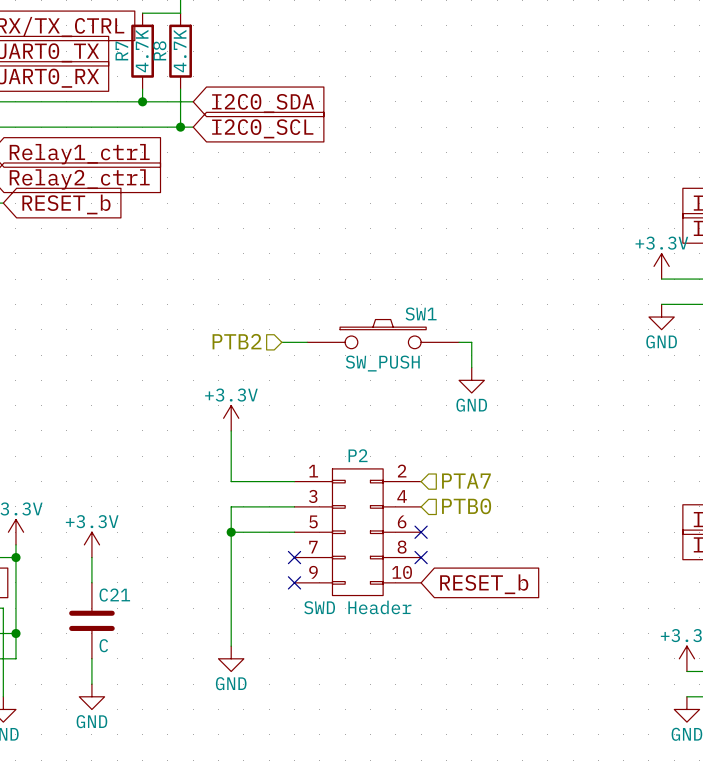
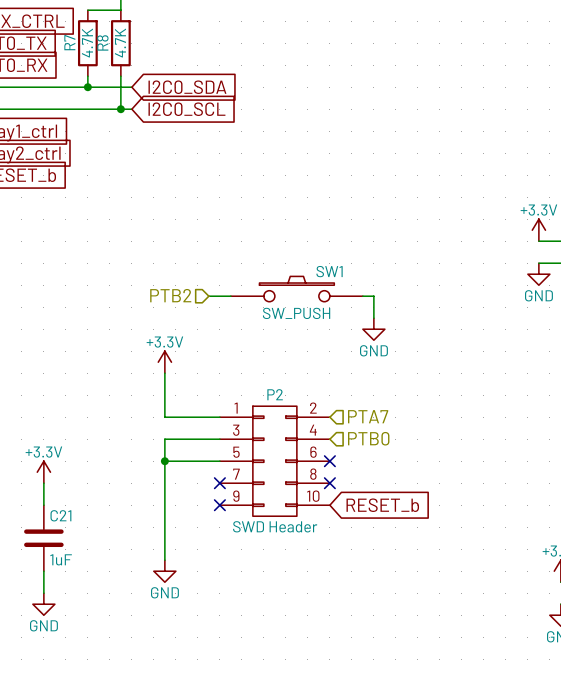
C21 value: C (103, 645) -> 1uF (61, 559)

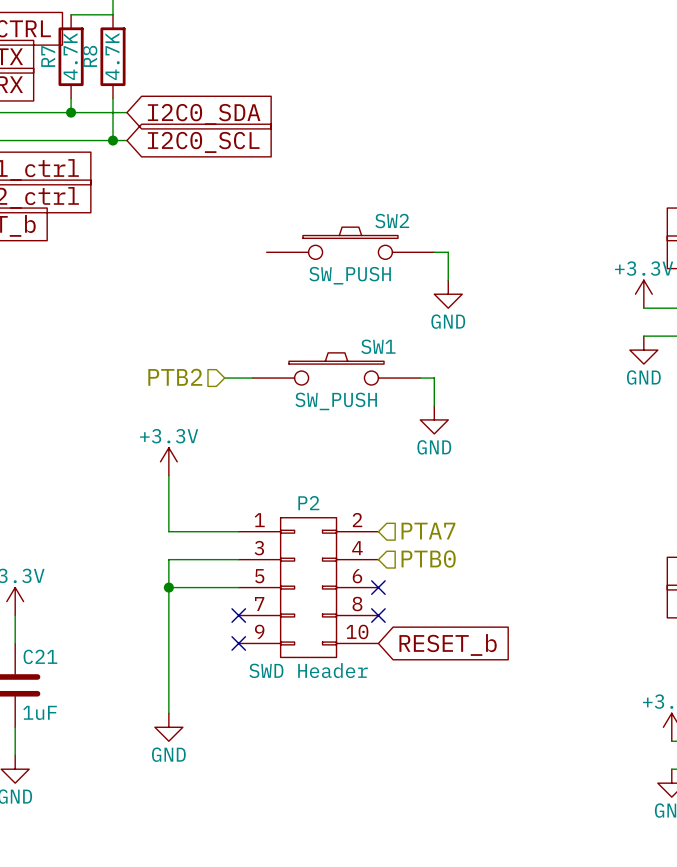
SW2: none -> SW_PUSH (350, 243)
wire: none -> (434, 252) (448, 252) (448, 280)
power symbol: none -> GND (448, 294)

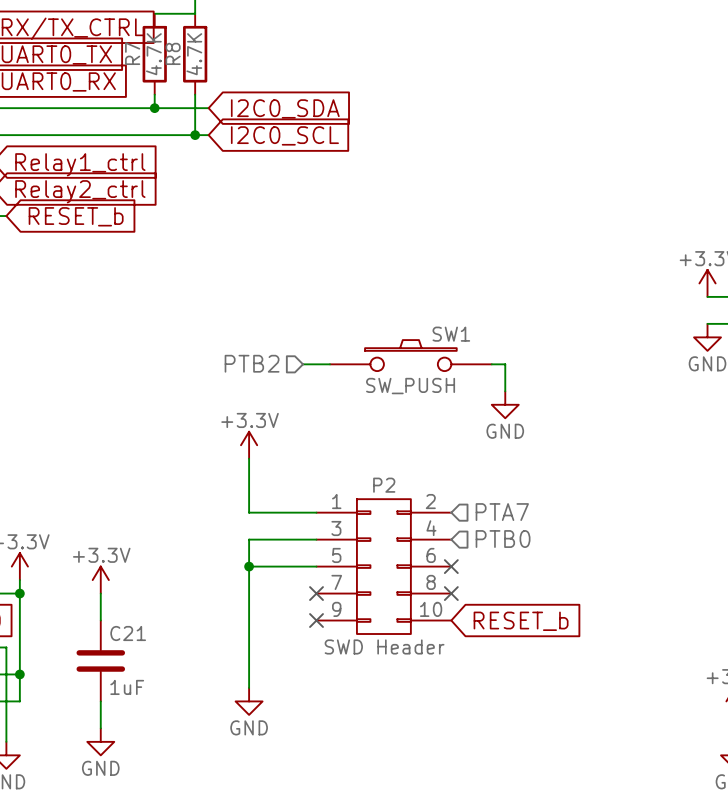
SW2: SW_PUSH (350, 243) -> none
wire: (434, 252) (448, 252) (448, 280) -> none
power symbol: GND (448, 294) -> none

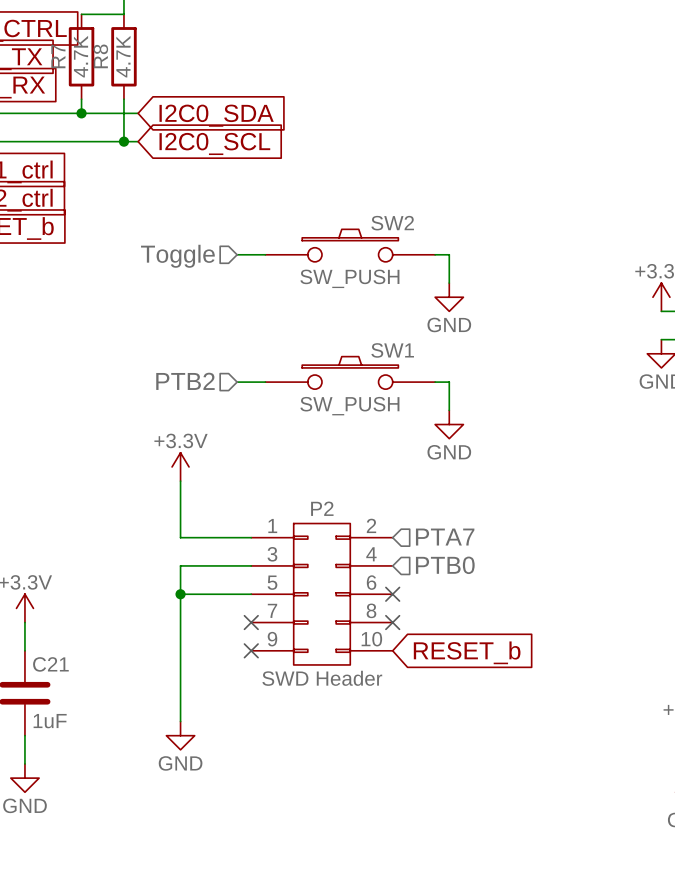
SW2: none -> SW_PUSH (350, 245)
wire: none -> (237, 254) (265, 254)
wire: none -> (435, 254) (449, 254) (449, 283)
hierarchical label: none -> Toggle (177, 256)
power symbol: none -> GND (449, 297)

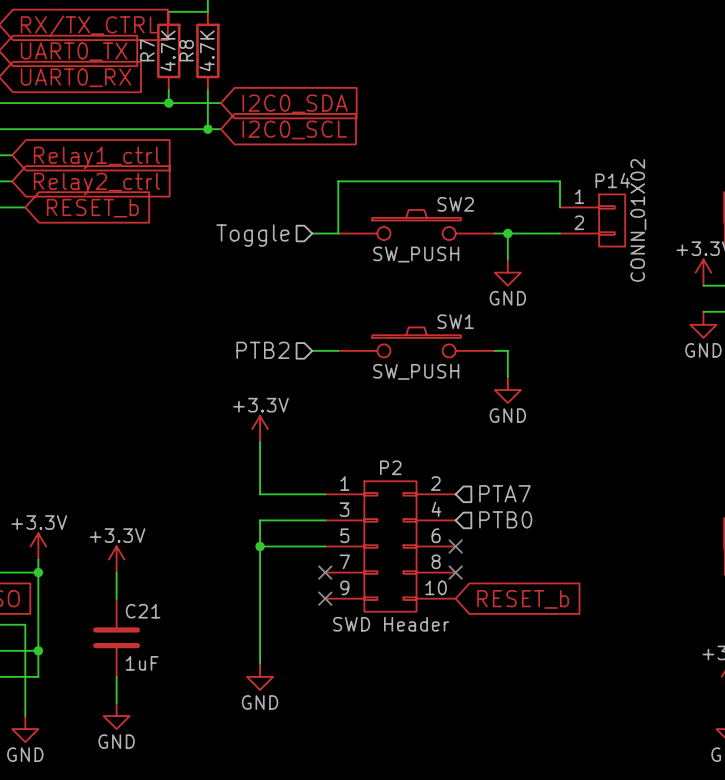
wire: none -> (560, 207) (560, 181) (338, 181) (338, 233)
P14: none -> CONN_01X02 (592, 220)
wire: none -> (507, 233) (560, 233)
junction: none -> (507, 233)

